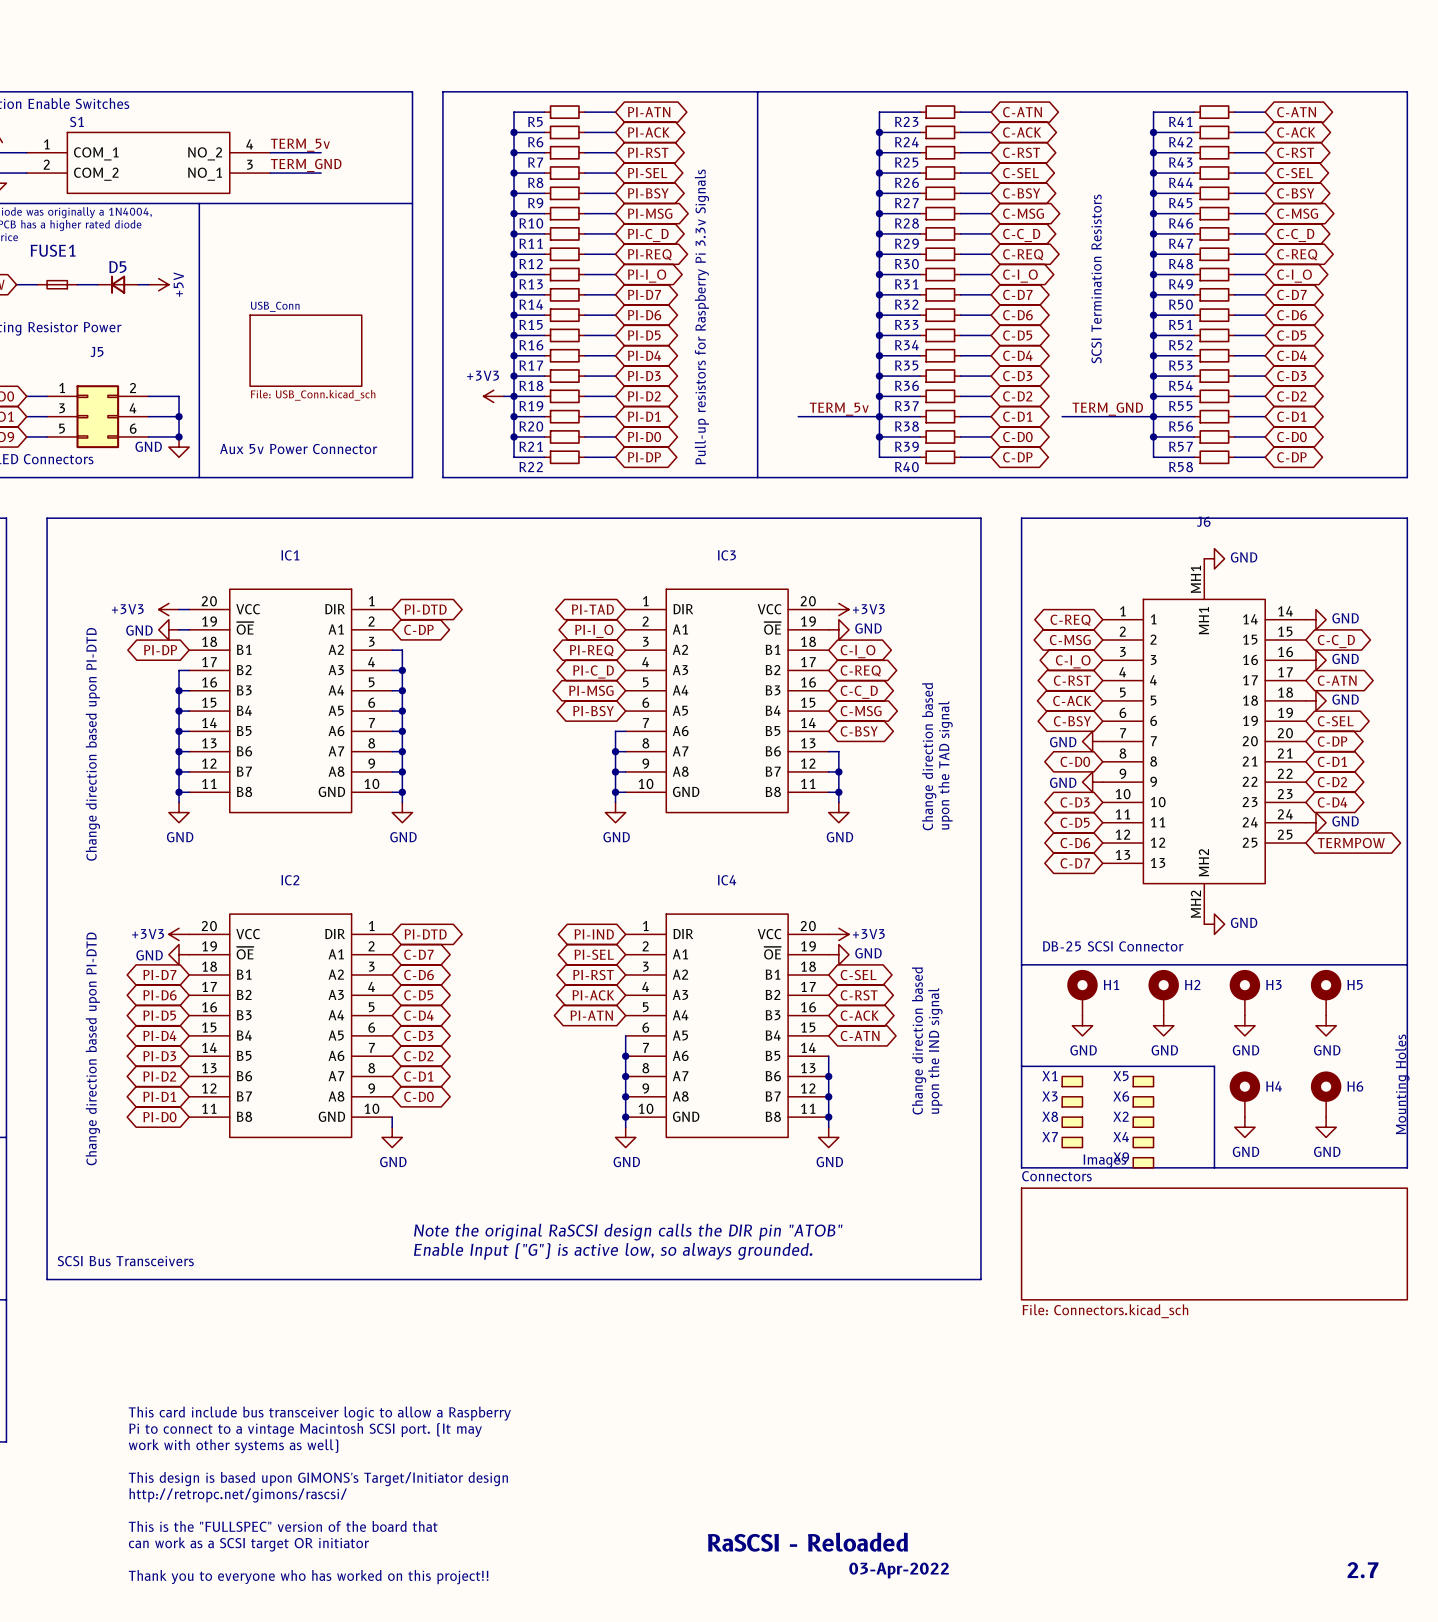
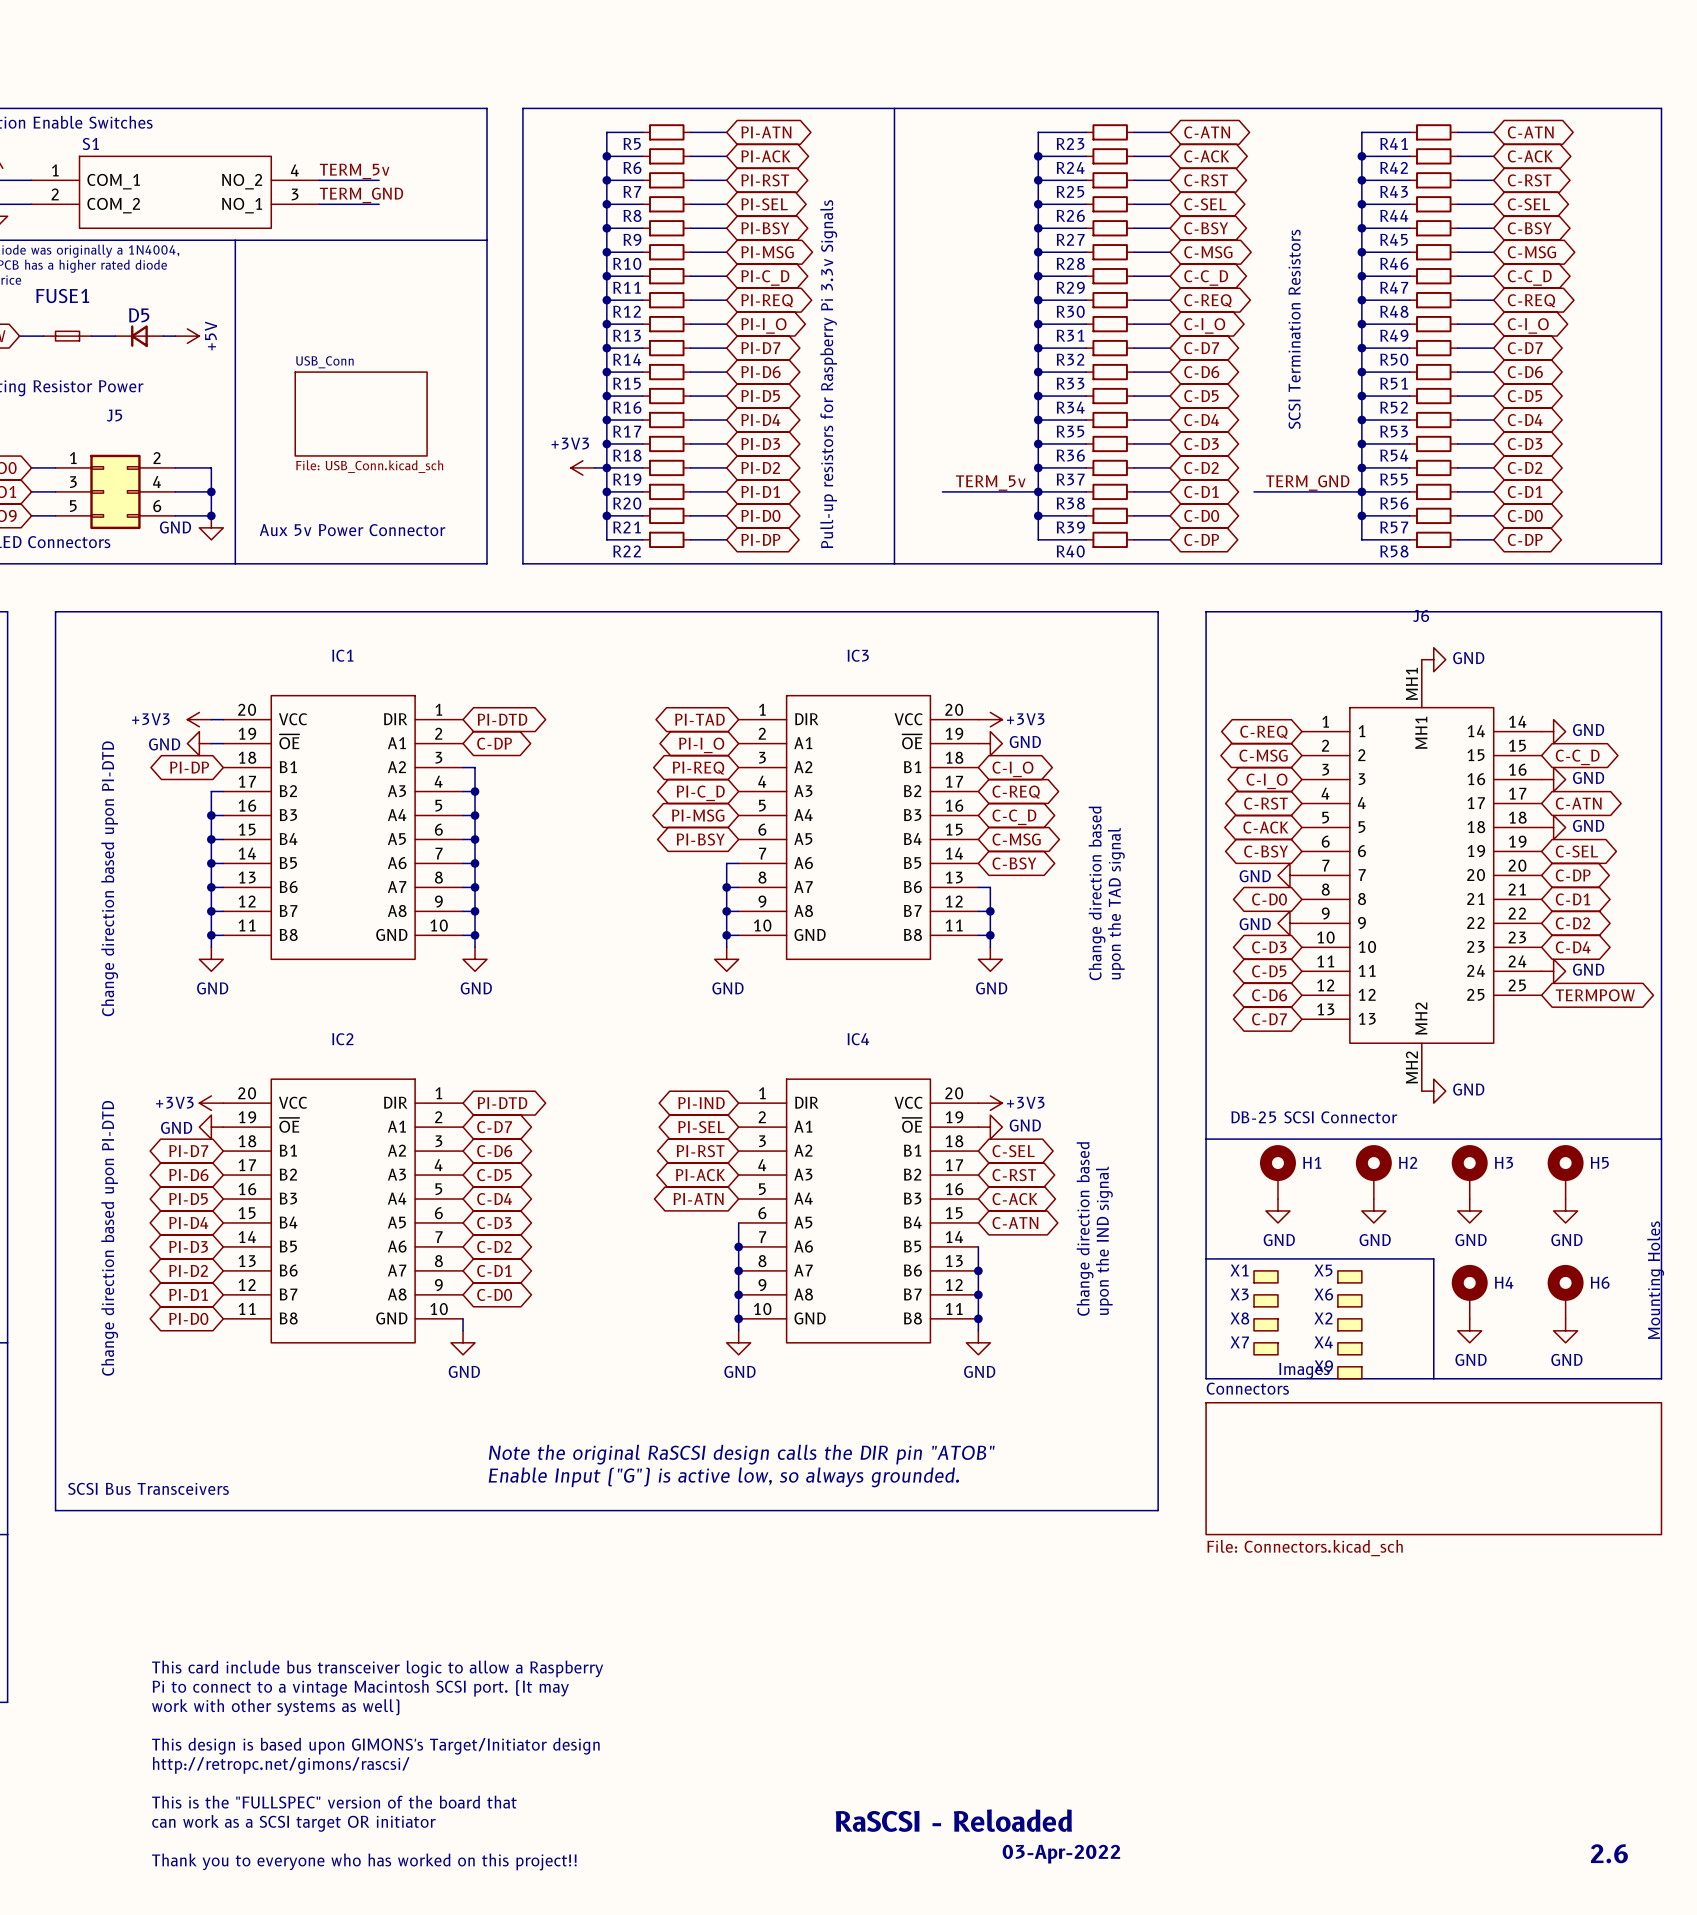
text: 2.7 (1363, 1570) -> 2.6 (1609, 1853)

